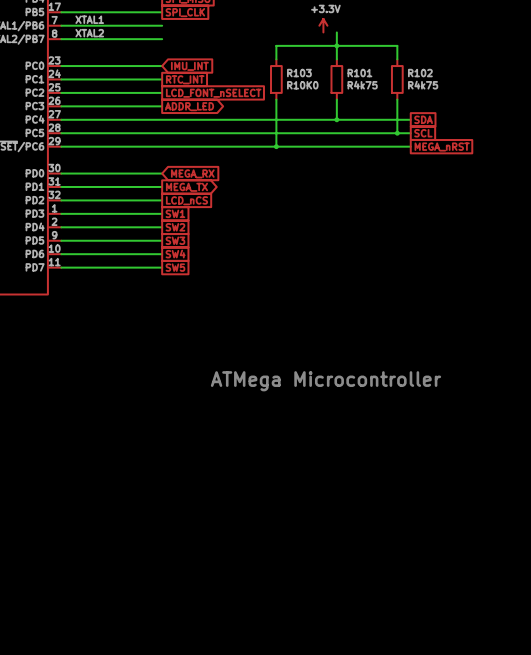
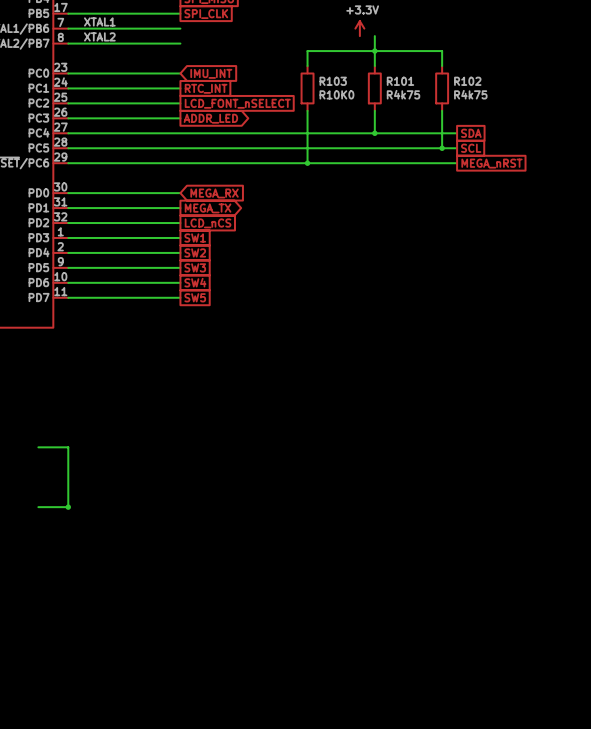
text: ATMega Microcontroller (326, 381) -> none
wire: none -> (38, 447) (68, 447) (68, 507) (38, 507)
junction: none -> (68, 507)

